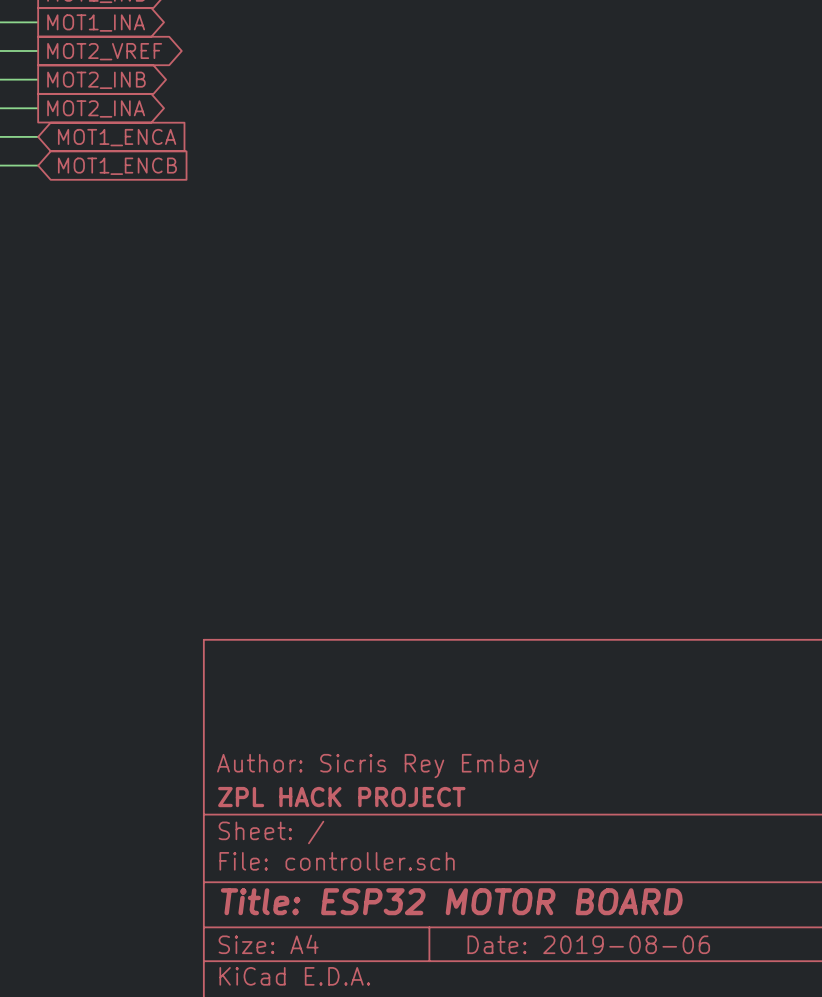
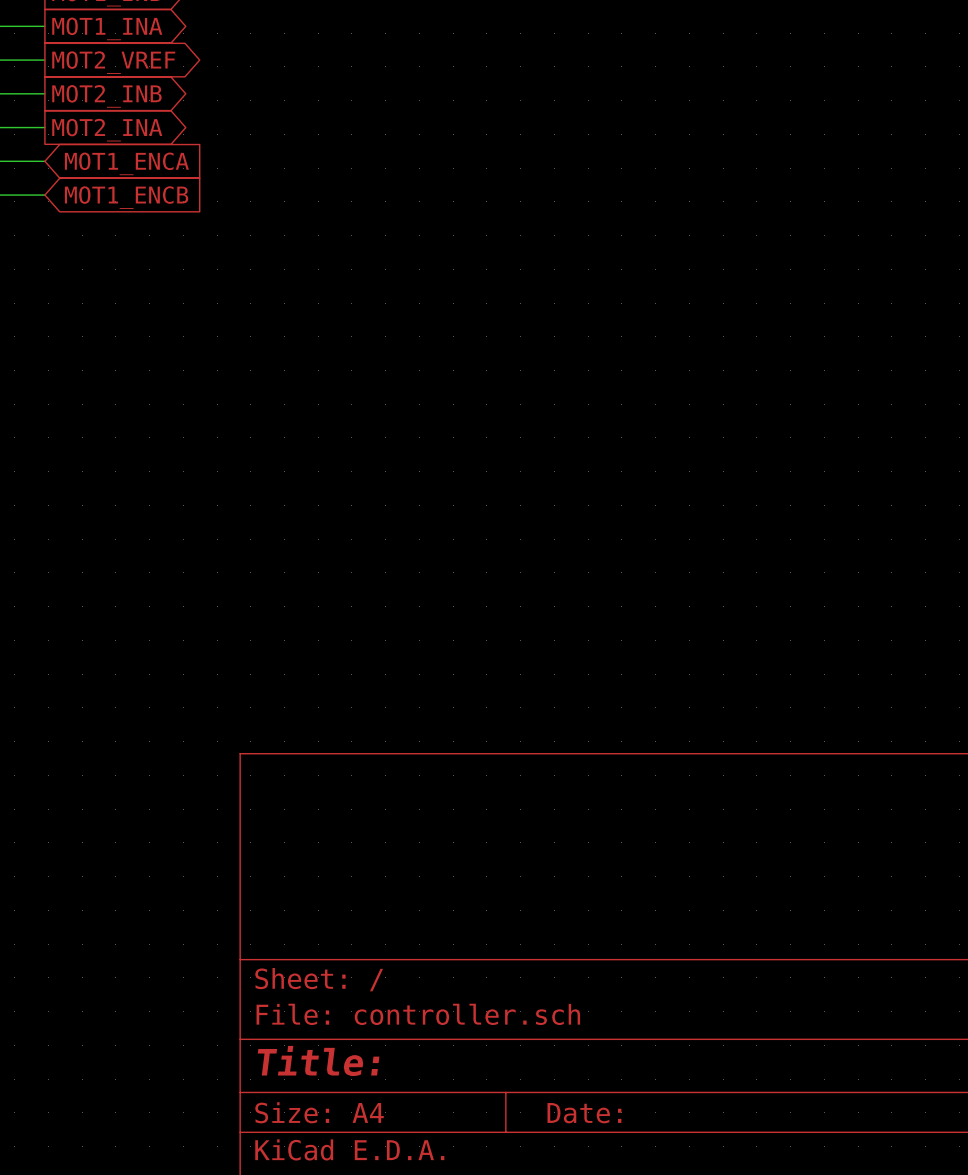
title block: Author: Sicris Rey Embay (377, 766) -> none
title block: ZPL HACK PROJECT (341, 797) -> none
title block: Title: ESP32 MOTOR BOARD (451, 901) -> Title: (318, 1060)
title block: Date: 2019-08-06 (588, 944) -> Date: (584, 1113)

